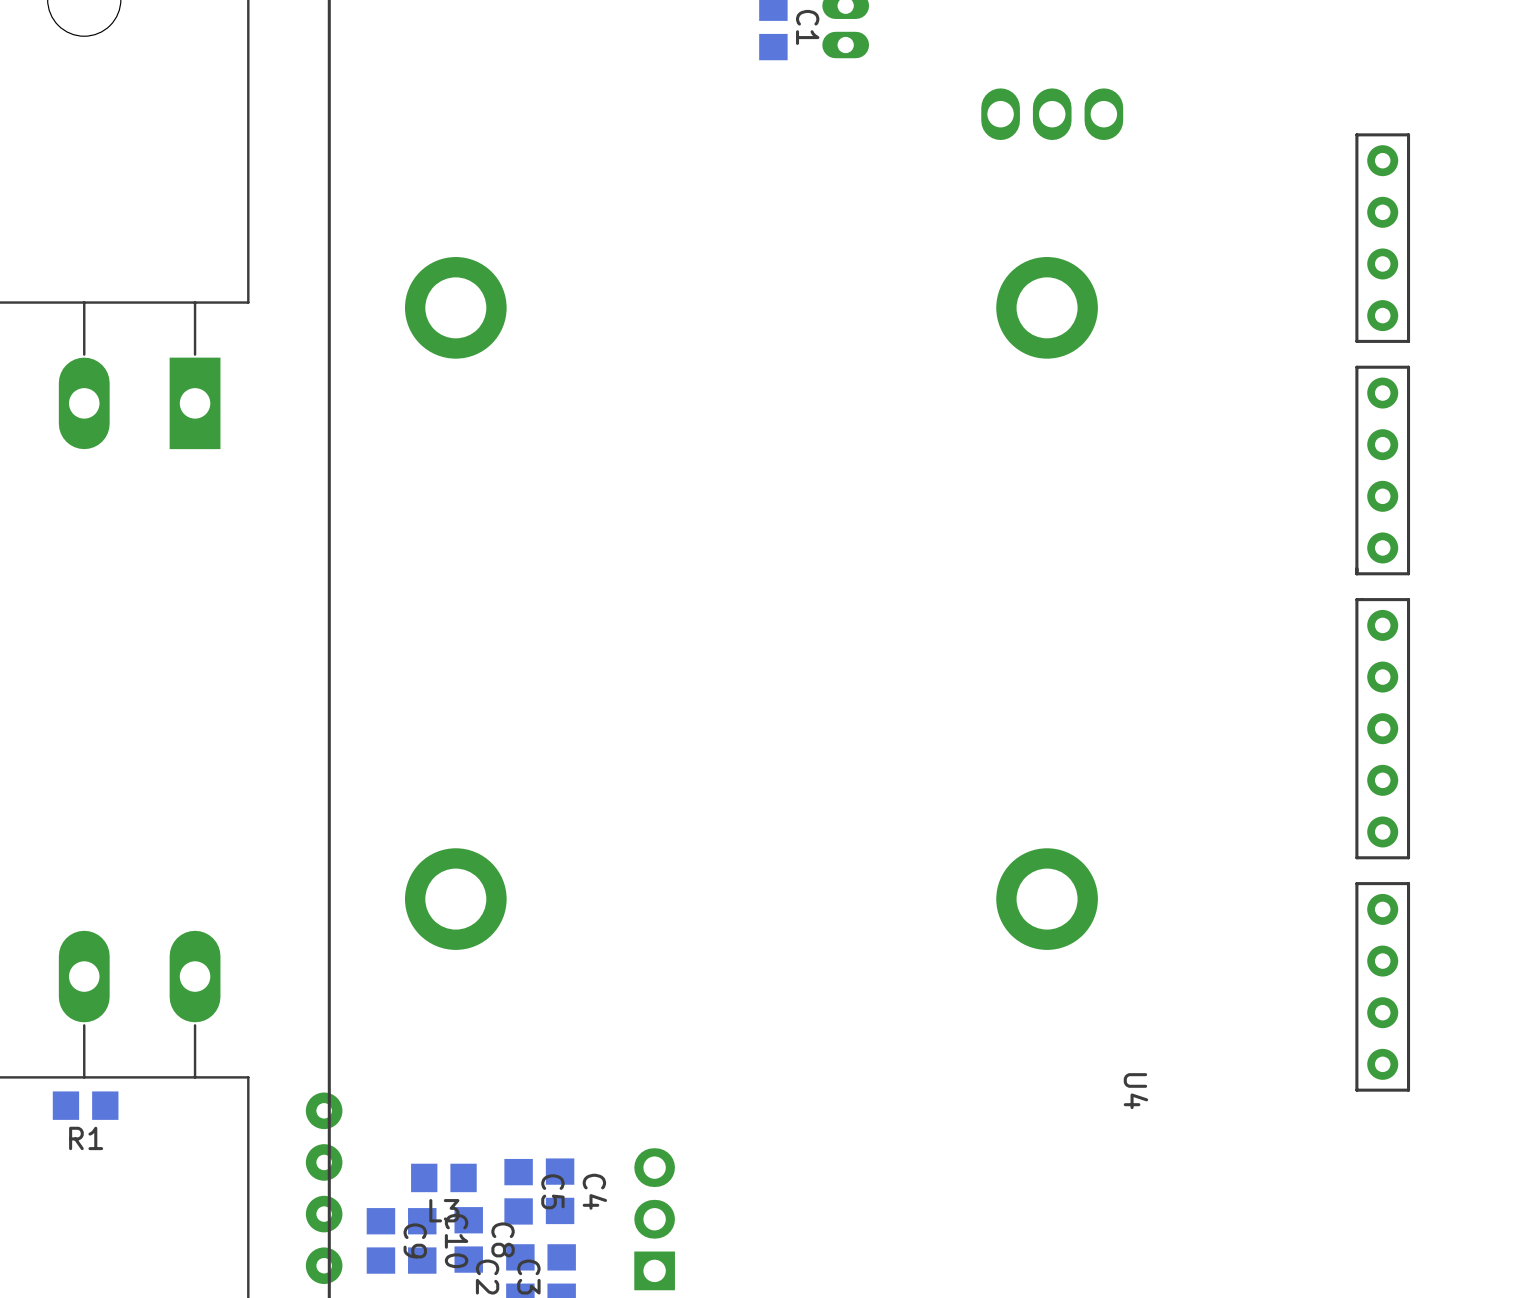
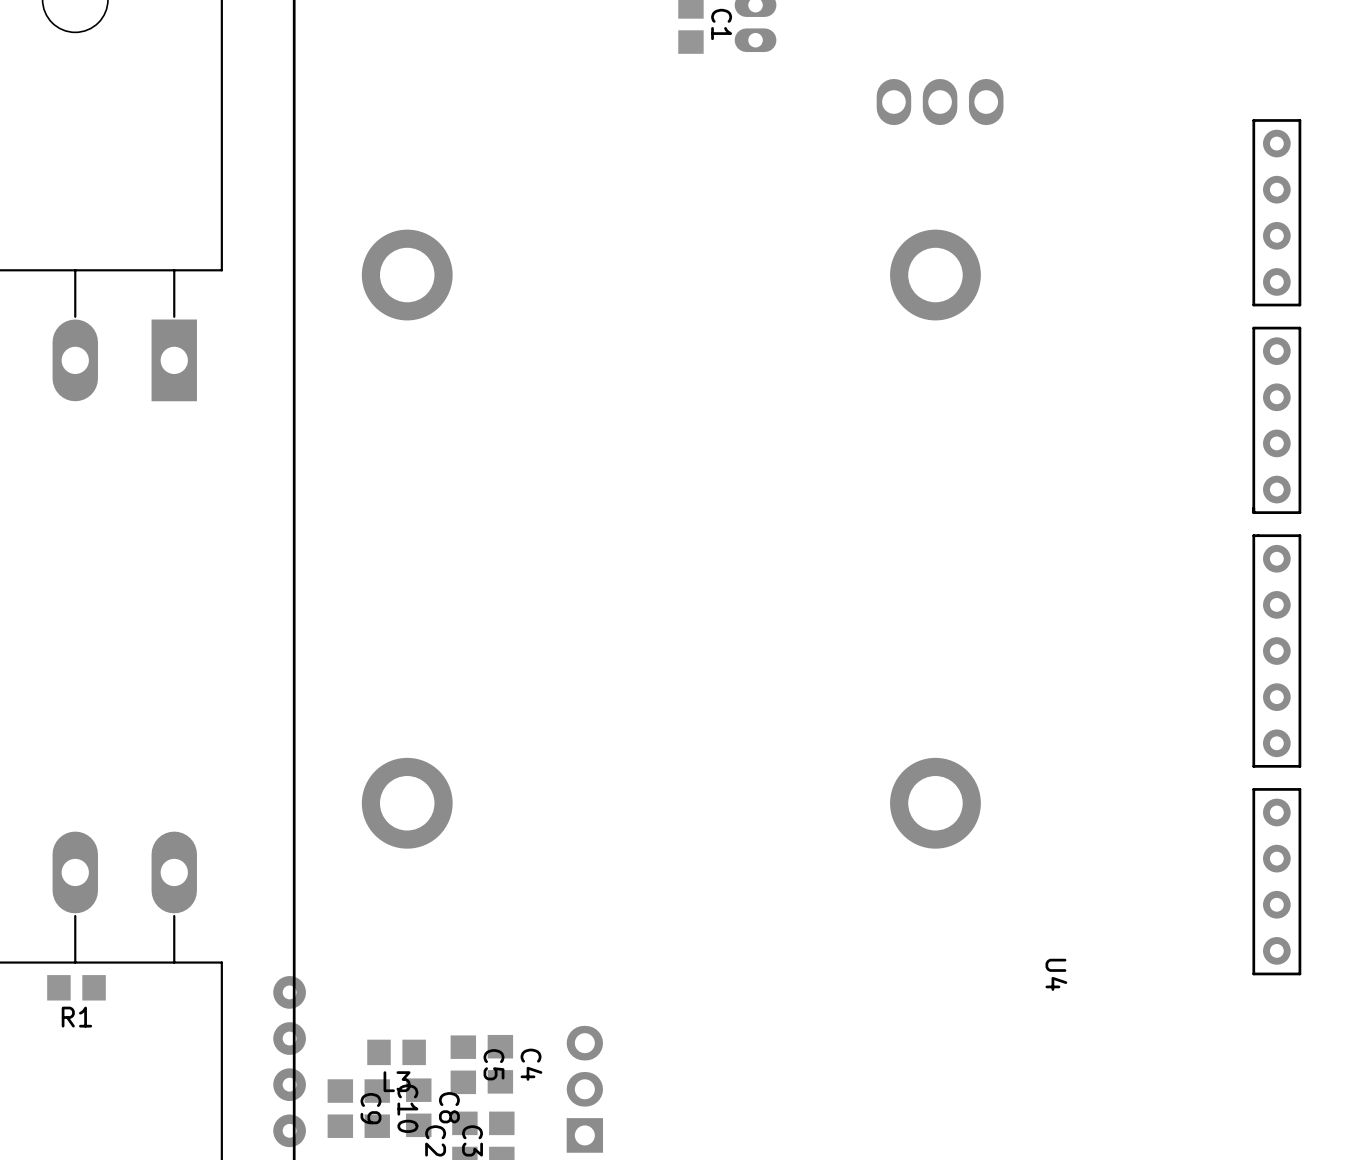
U4 position: (1382, 612) -> (1276, 547)

